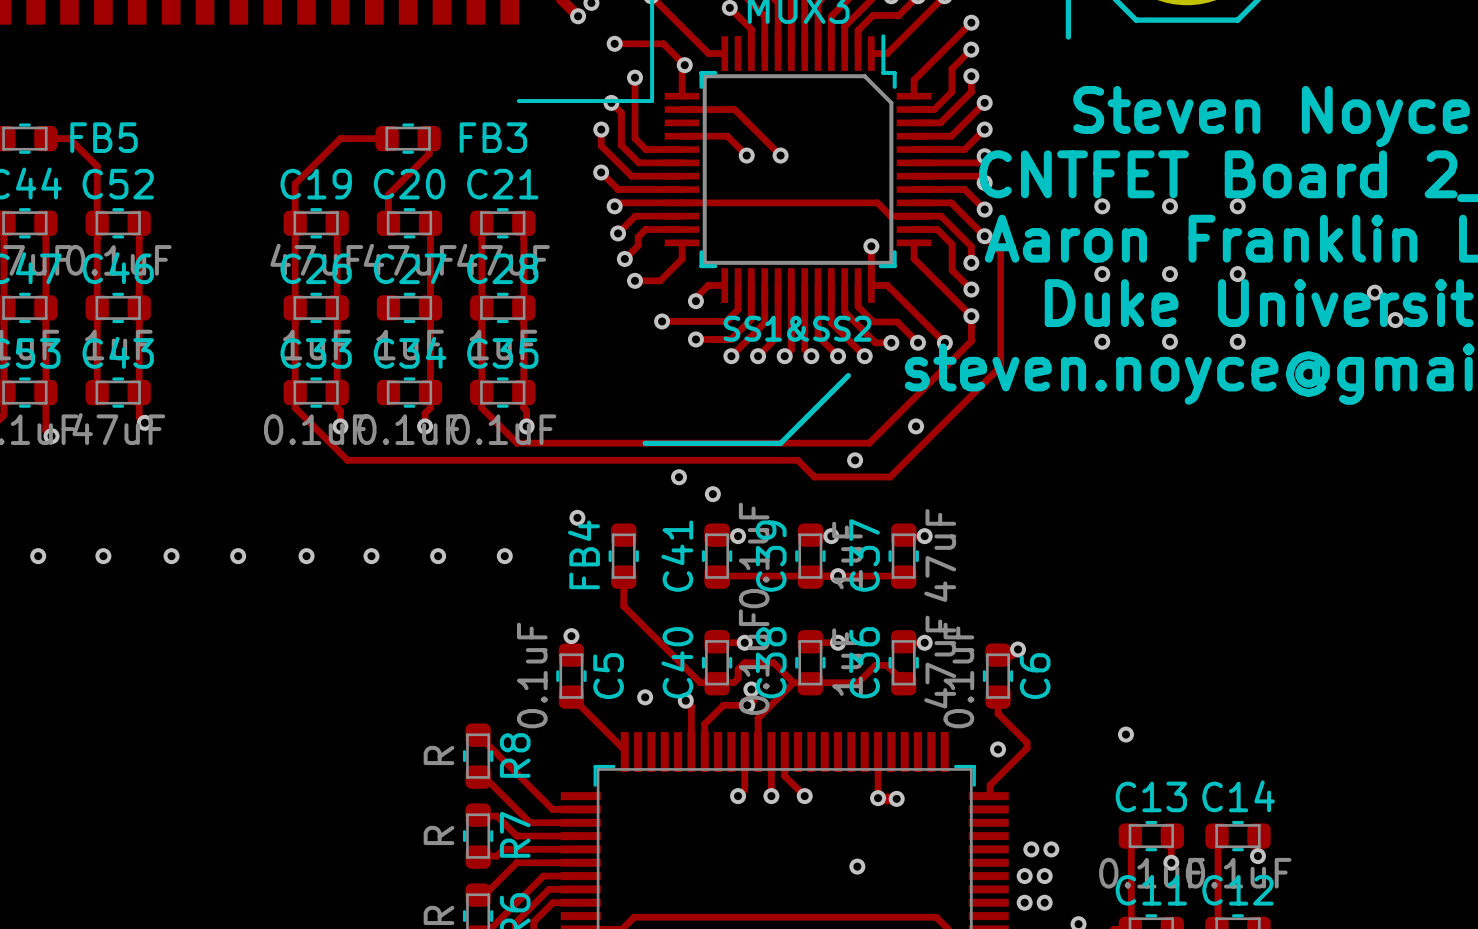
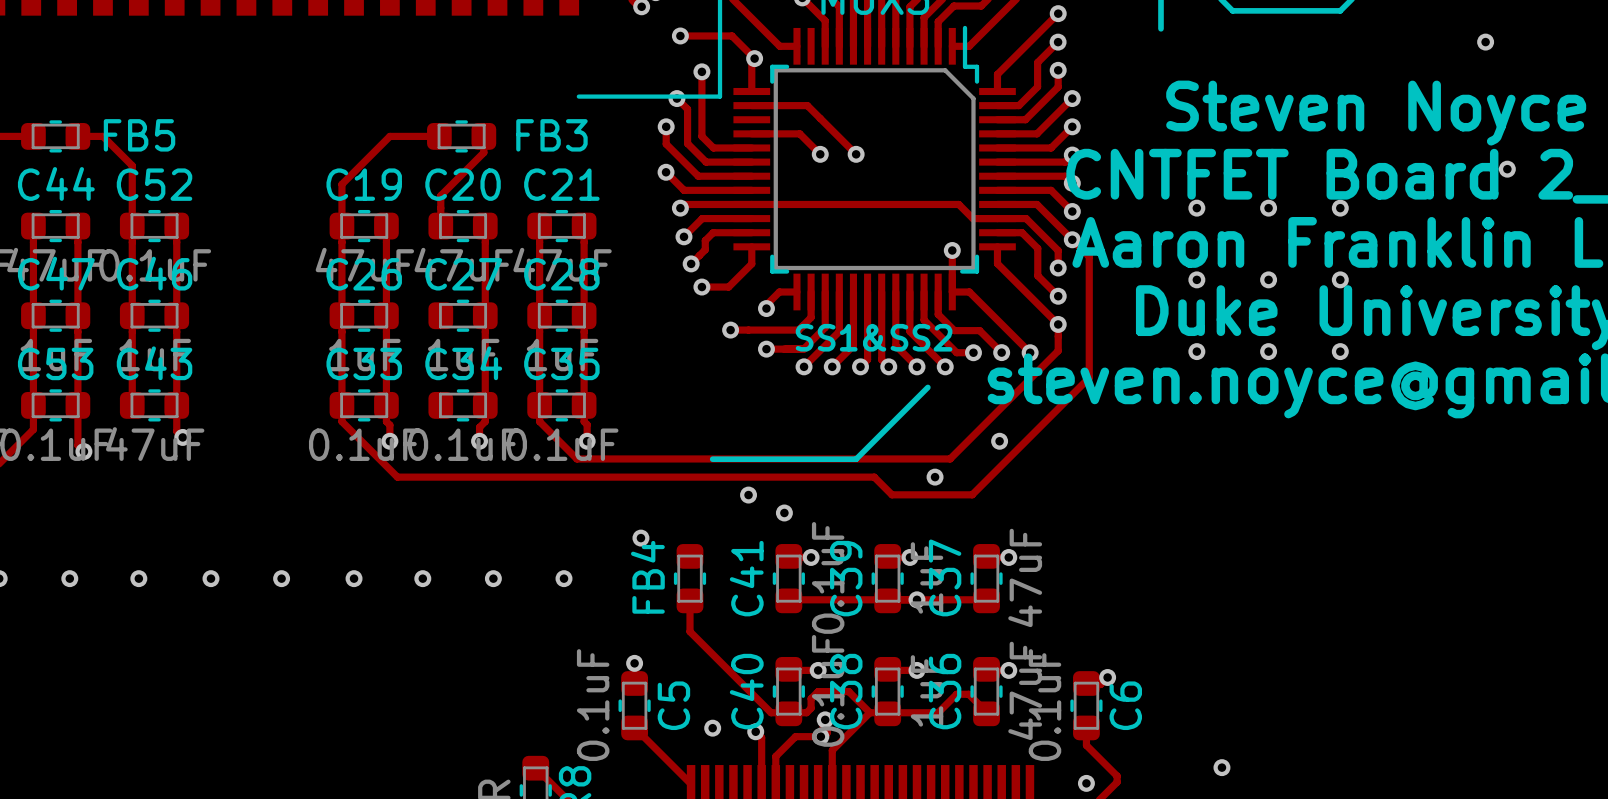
via: none -> (1485, 42)
via: none -> (1507, 169)
via: (1374, 292) -> none
via: (1395, 320) -> none

